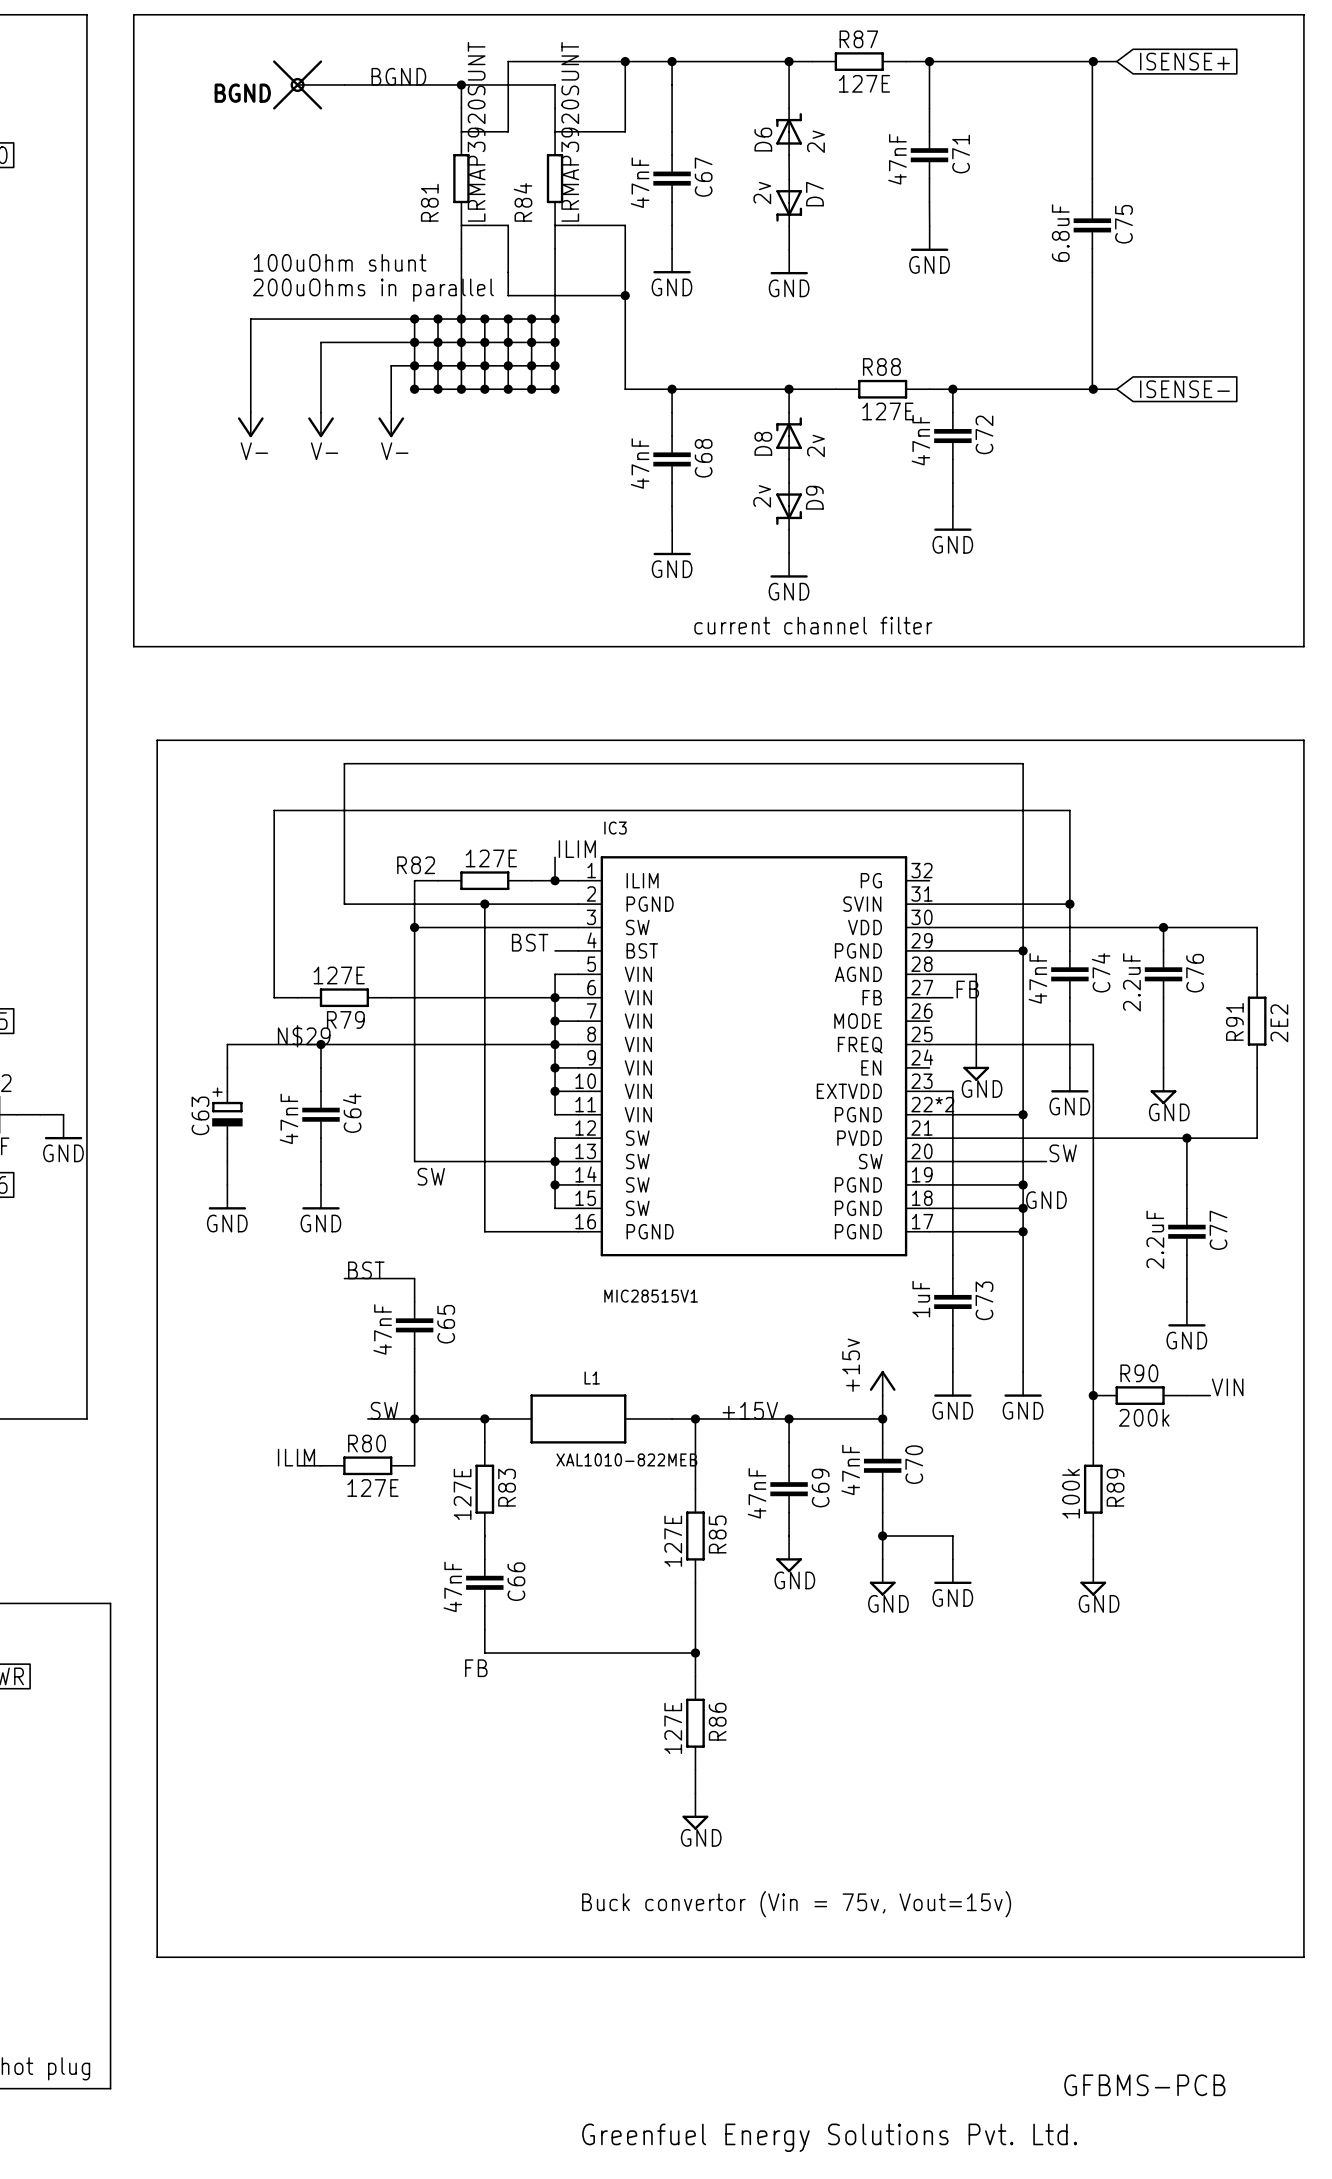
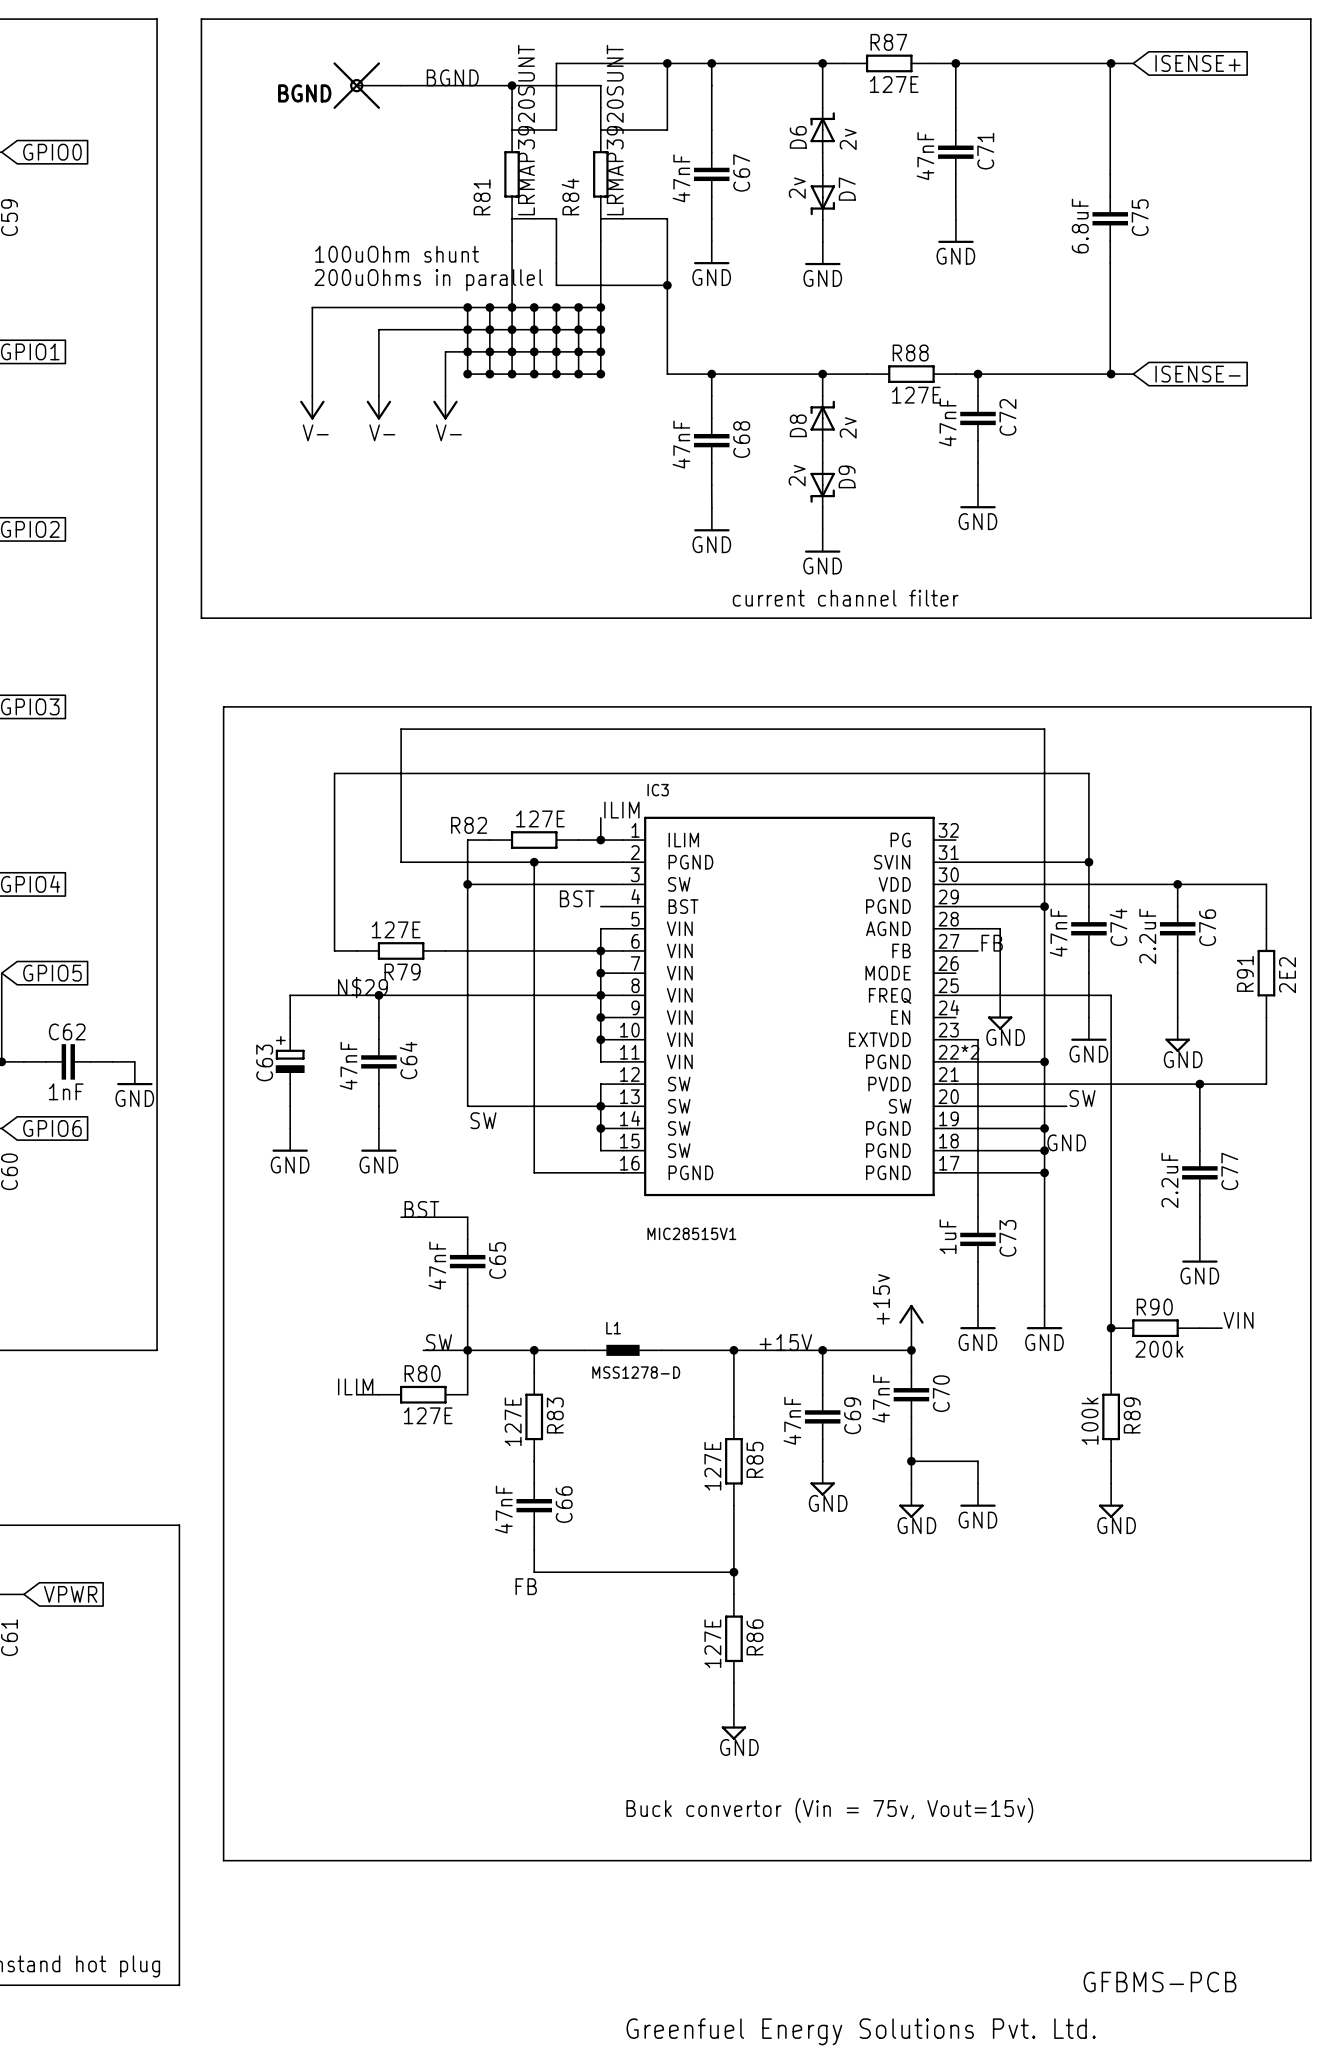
L1 name position: L1 (592, 1378) -> L1 (613, 1328)
L1 symbol: [484, 1394, 673, 1444] -> [584, 1344, 662, 1356]
L1 value: XAL1010-822MEB (626, 1459) -> MSS1278-D (636, 1372)

